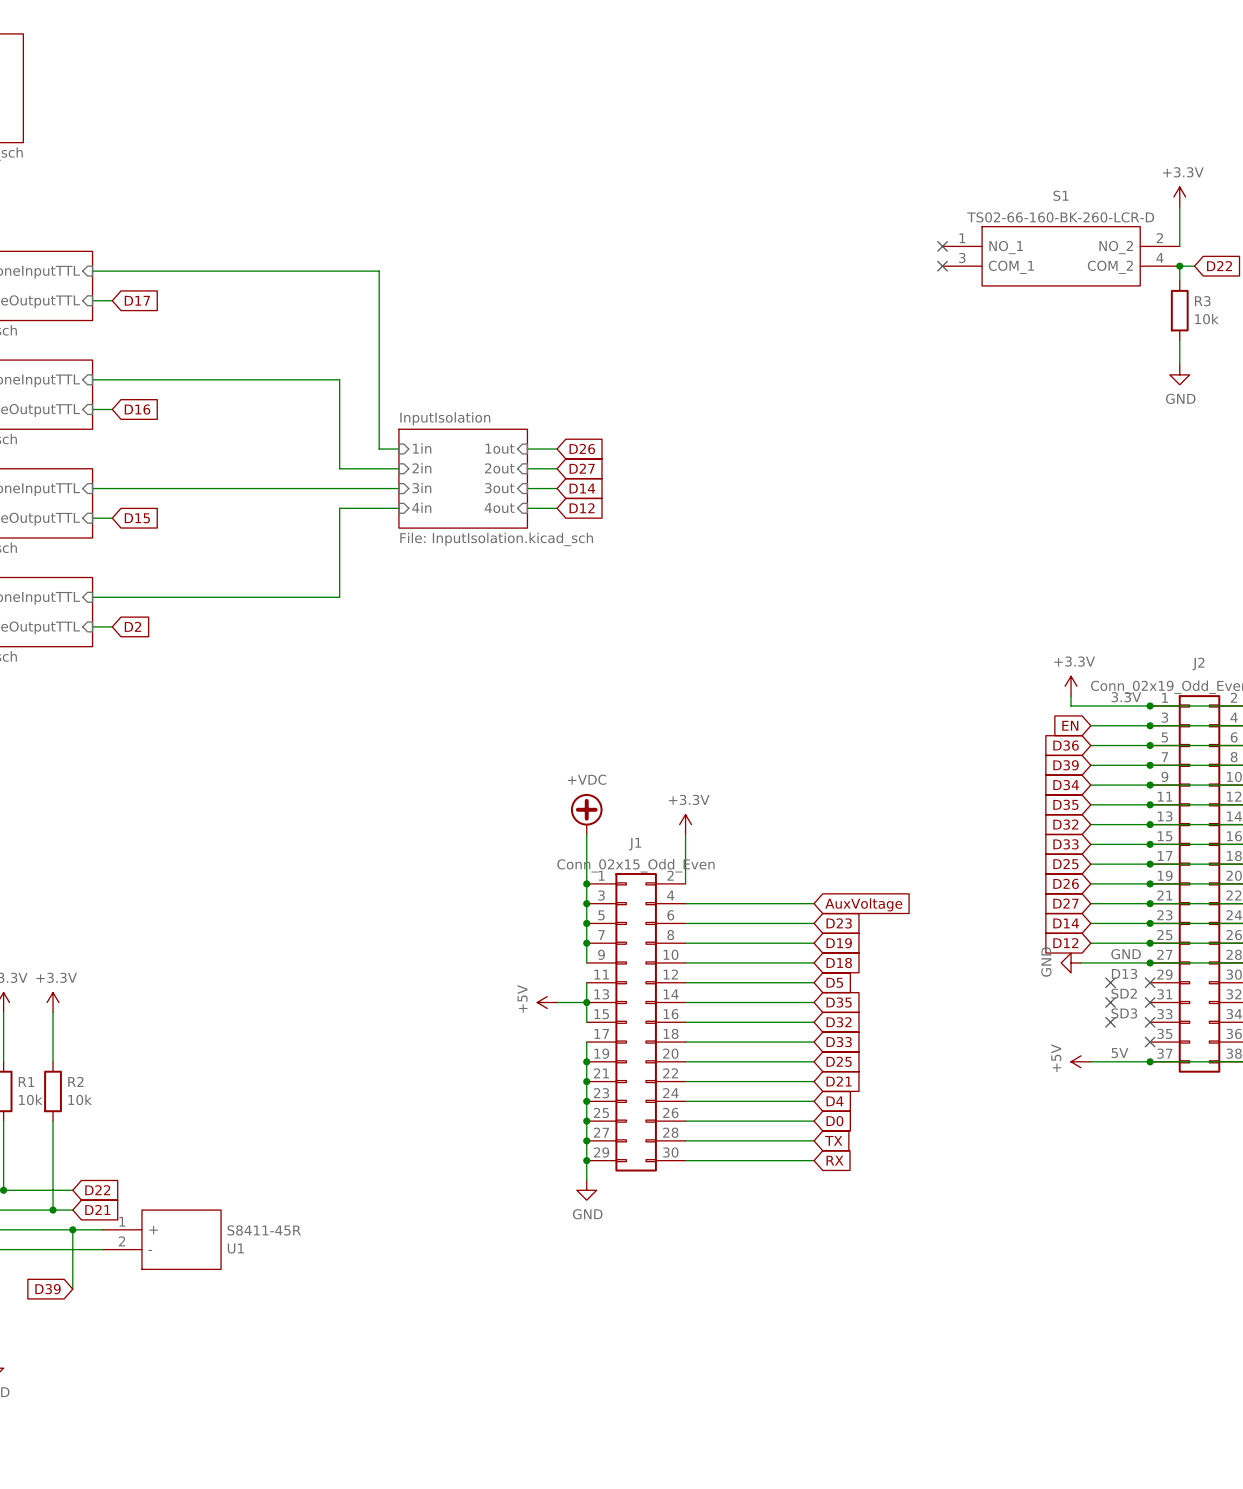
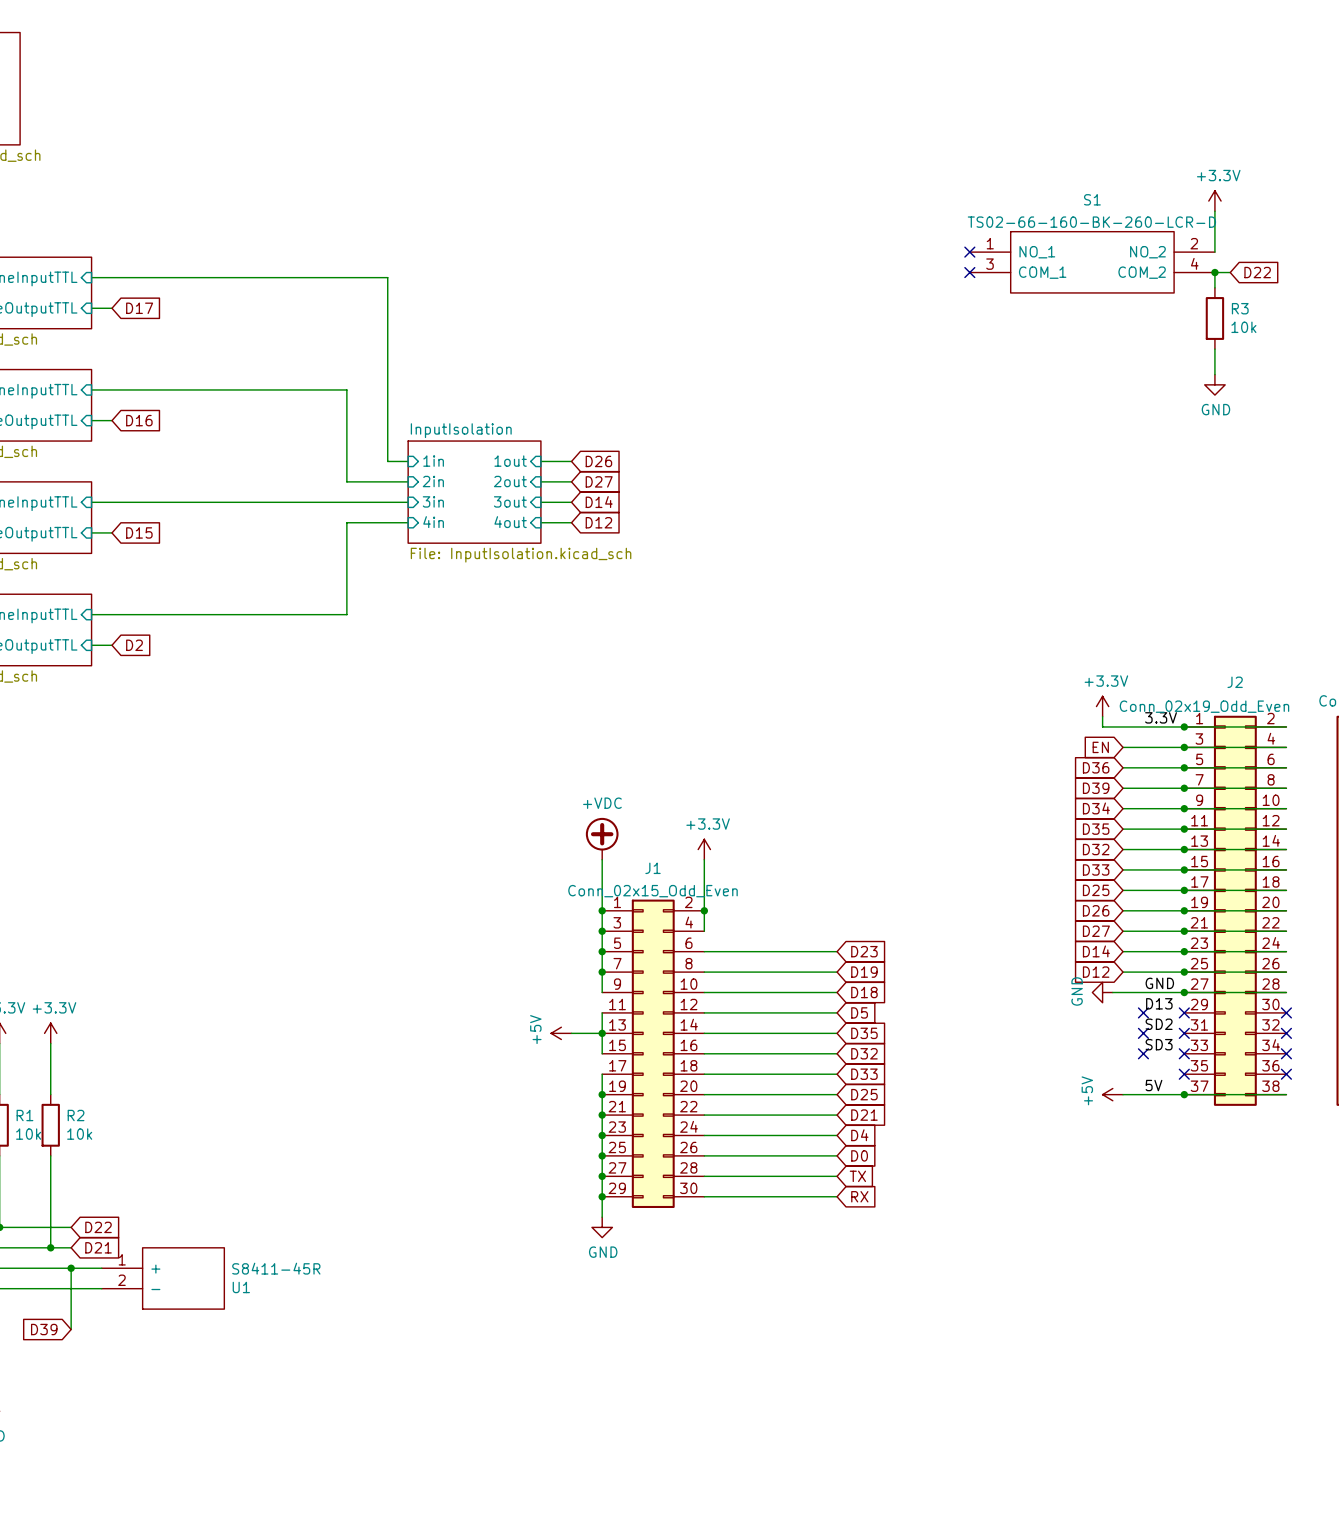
junction: none -> (704, 910)
wire: (685, 903) (814, 903) -> (704, 931) (704, 910)
global label: AuxVoltage (863, 904) -> none

